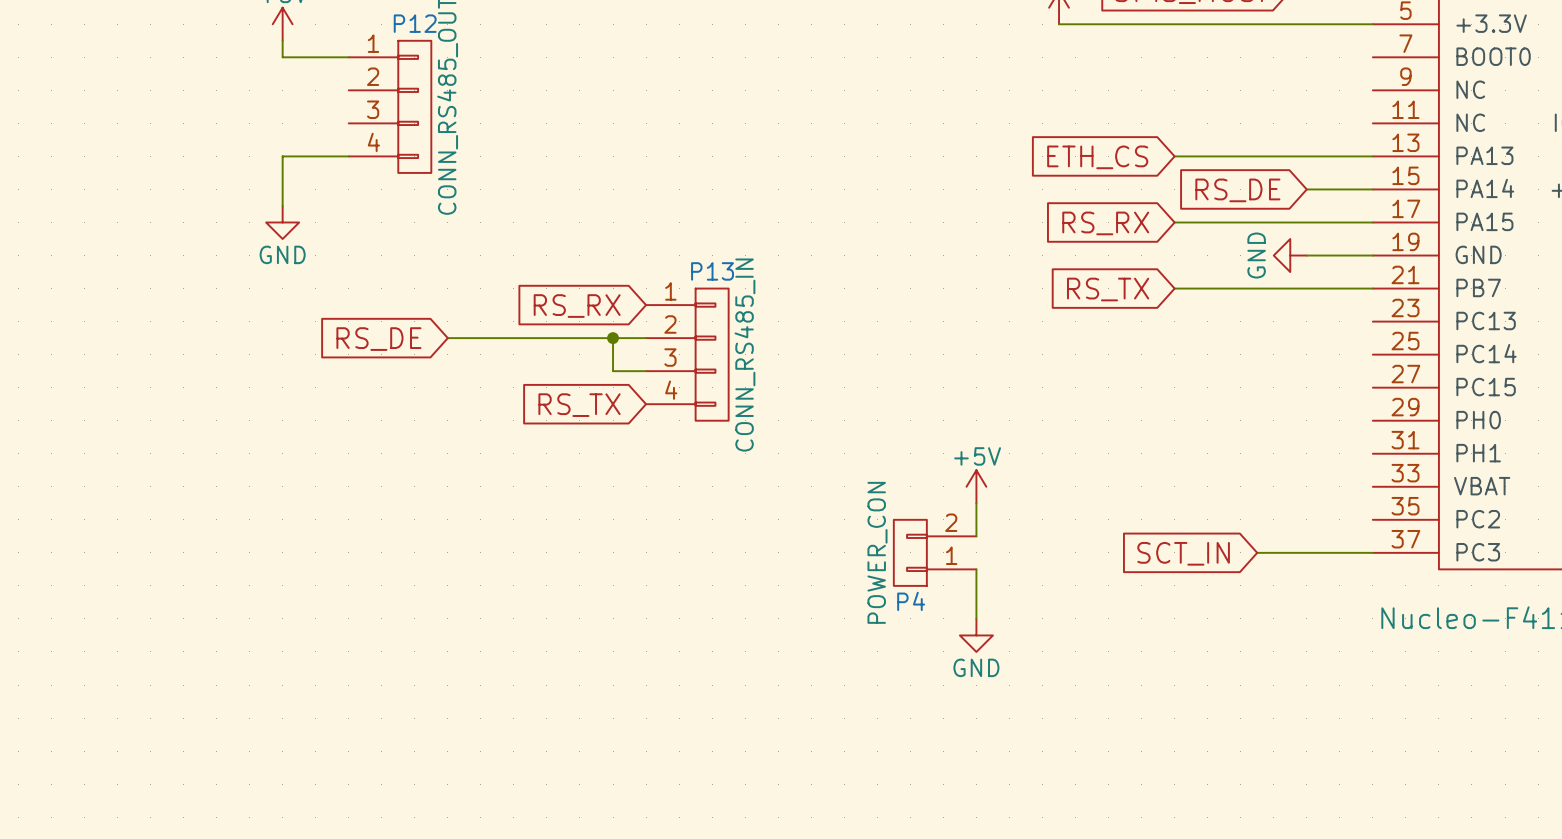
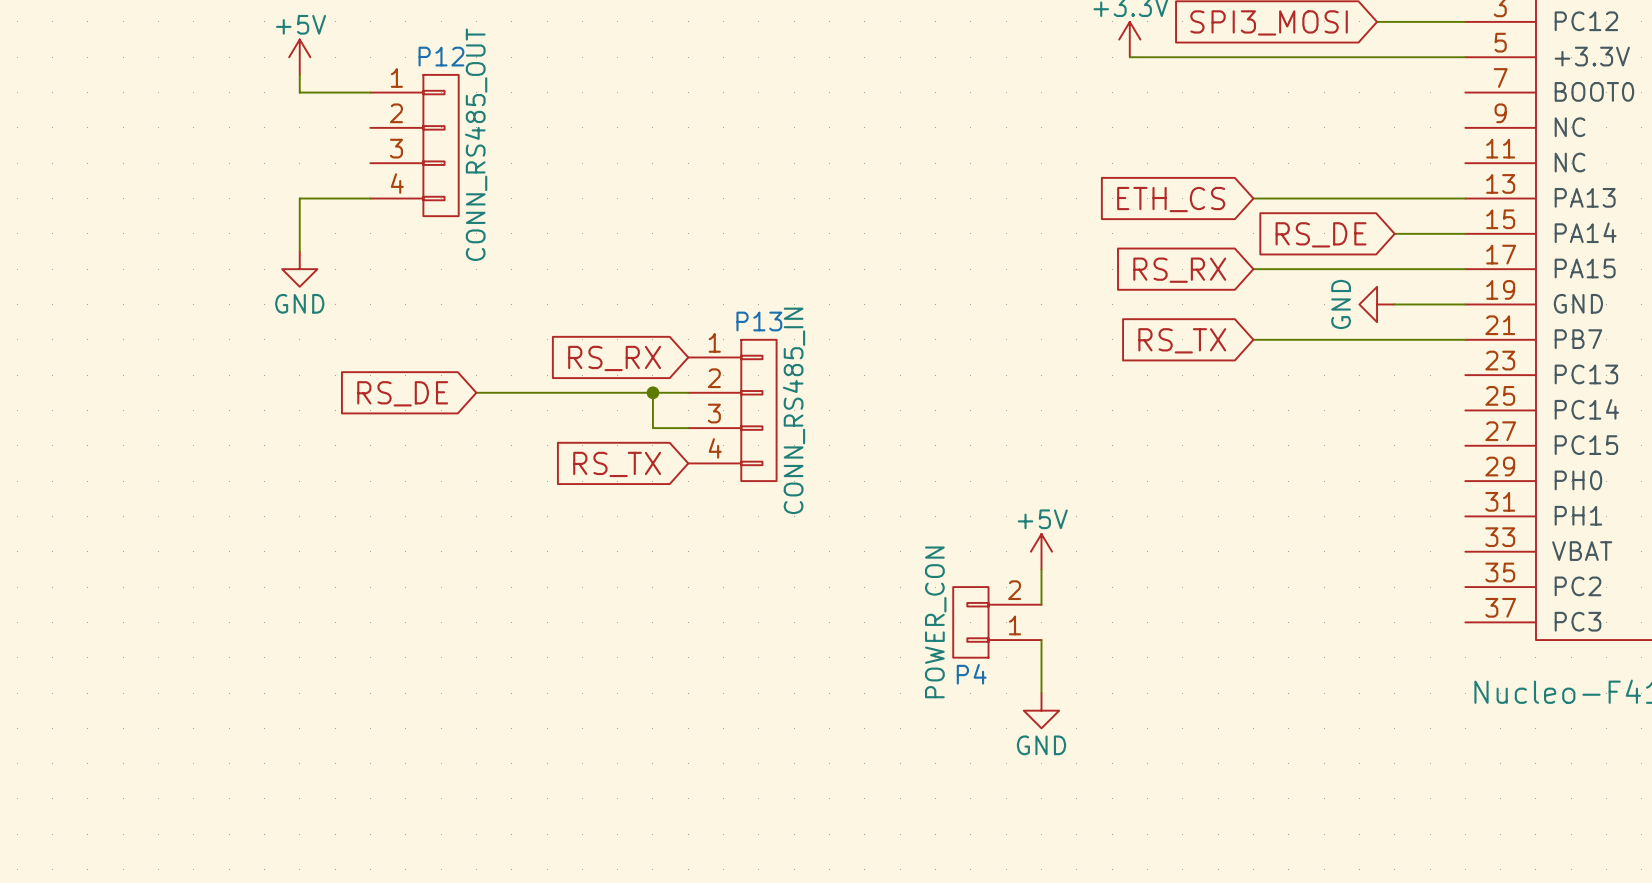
wire: (1257, 552) (1372, 552) -> none
global label: SCT_IN (1183, 553) -> none

